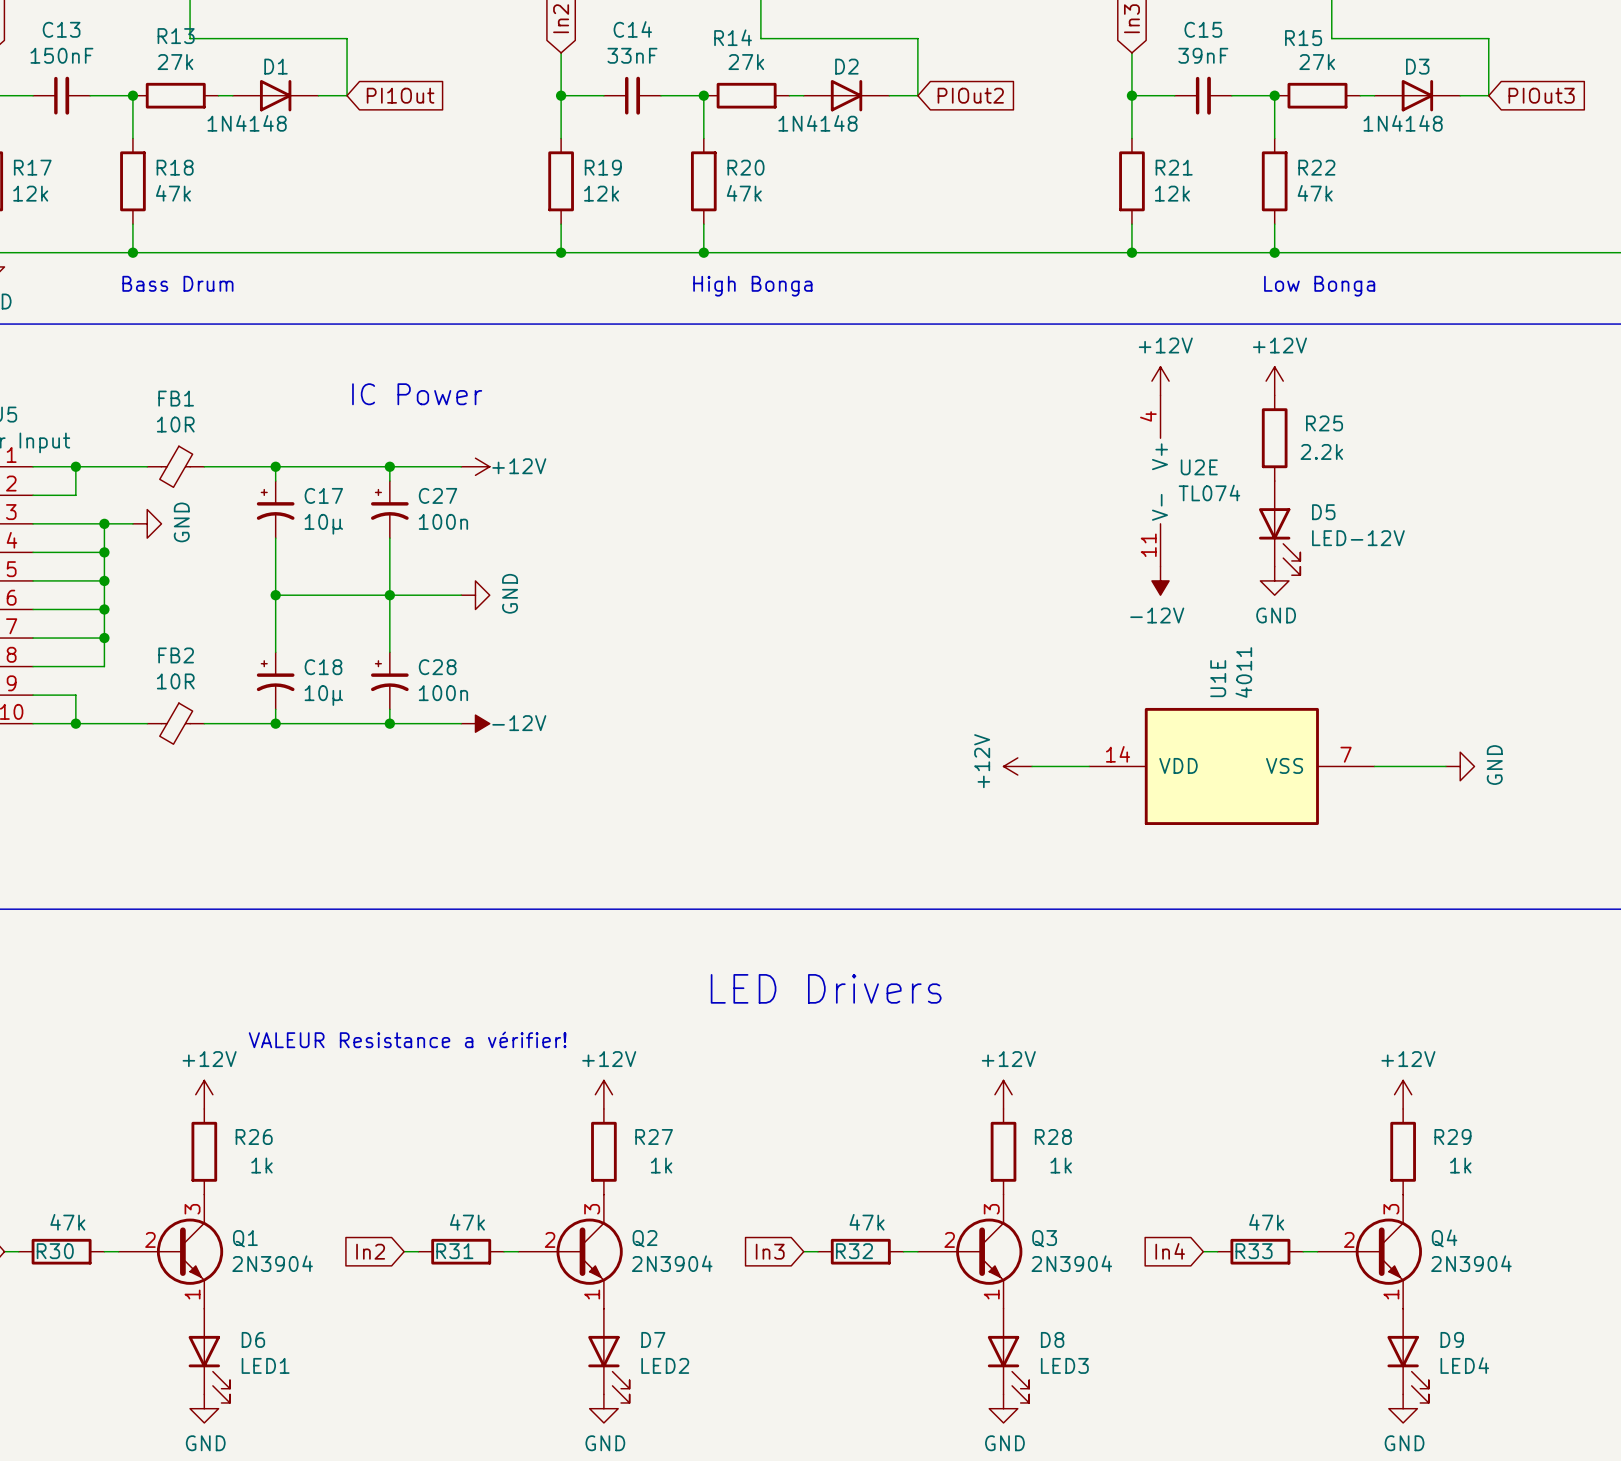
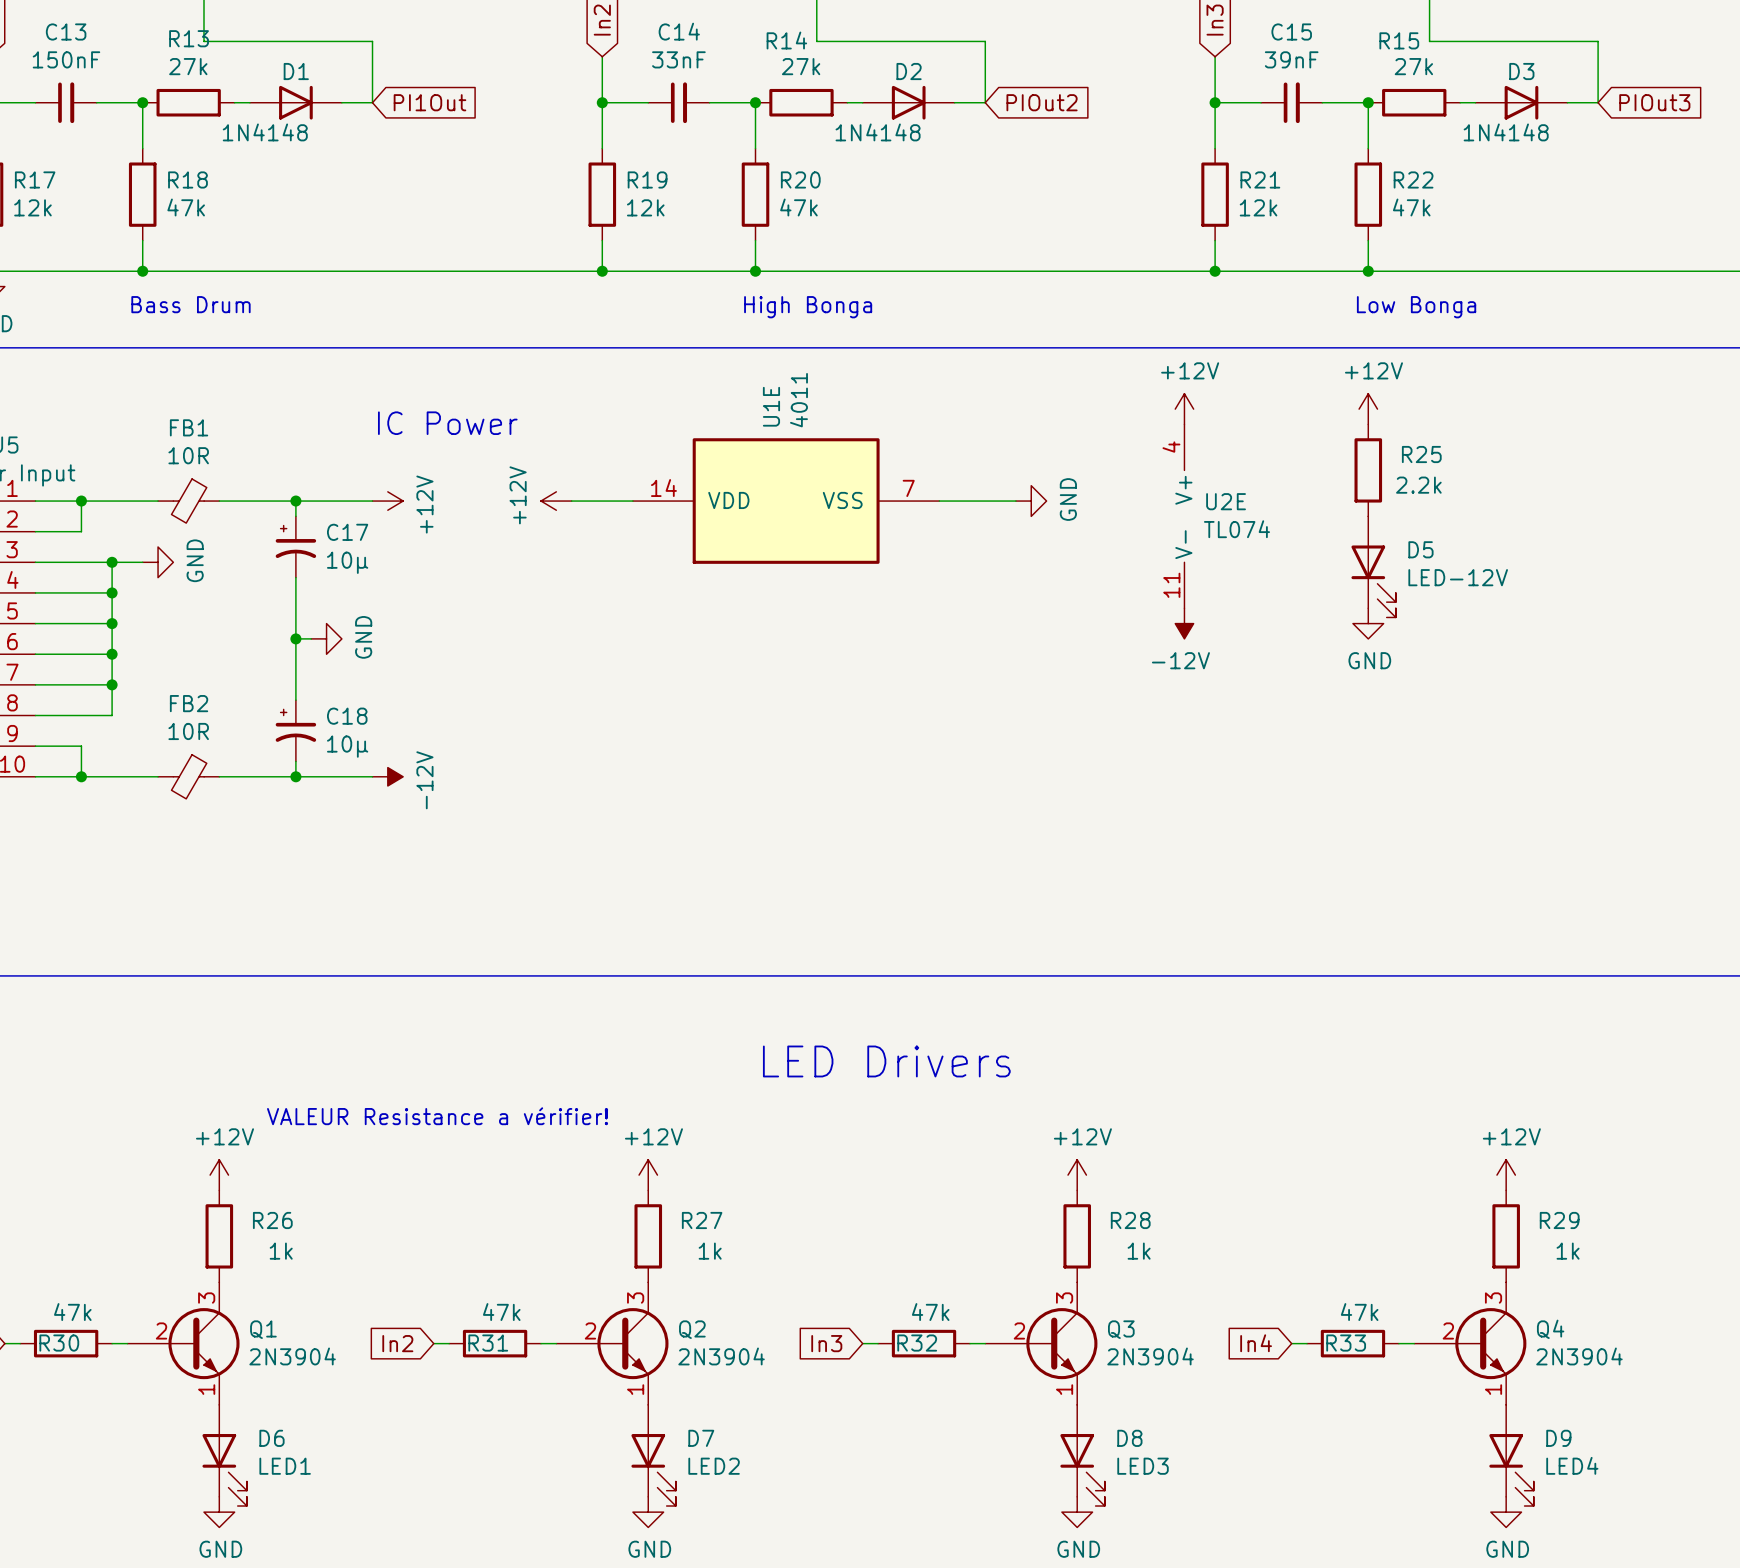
power symbol position: +12V (1160, 381) -> +12V (1184, 409)
wire: (347, 466) (461, 466) -> none
power symbol: none -> +12V (387, 501)
wire: (389, 466) (389, 481) -> none
junction: (389, 466) -> none
power symbol rotation: 0° (475, 466) -> 180° (556, 501)
power symbol position: +12V (475, 466) -> +12V (556, 501)
wire: none -> (571, 501) (632, 501)
wire: none -> (939, 501) (1015, 501)
power symbol: none -> GND (1031, 501)
U2E position: (1160, 481) -> (1184, 516)
C27: 100n (389, 509) -> none
wire: (389, 538) (389, 652) -> none
power symbol position: -12V (1160, 580) -> -12V (1184, 623)
wire: (289, 595) (461, 595) -> none
junction: (389, 595) -> none
power symbol position: GND (475, 595) -> GND (326, 638)
C28: 100n (389, 680) -> none
wire: (389, 709) (389, 723) -> none
wire: (347, 723) (461, 723) -> none
junction: (389, 723) -> none
power symbol position: -12V (475, 723) -> -12V (387, 776)
power symbol text rotation: 0° (519, 723) -> 90° counterclockwise (424, 780)
power symbol: +12V (1017, 766) -> none
wire: (1032, 766) (1089, 766) -> none
U1E position: (1231, 766) -> (786, 501)
wire: (1374, 766) (1445, 766) -> none
power symbol: GND (1460, 766) -> none

